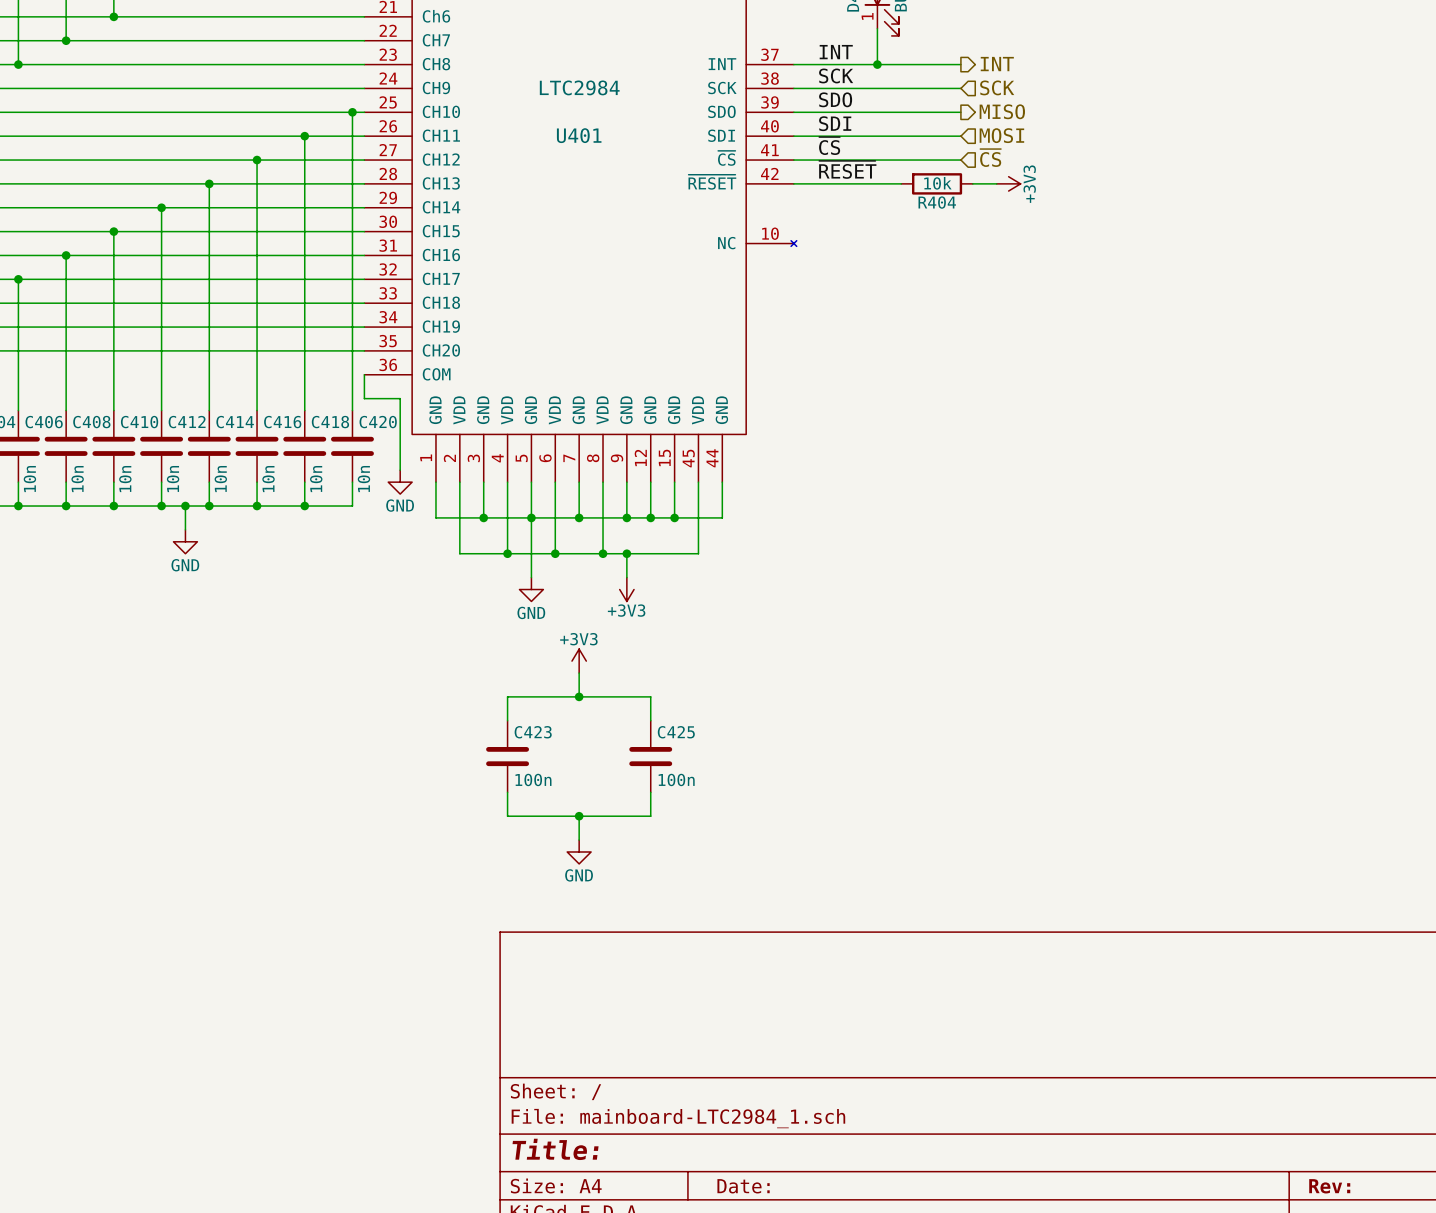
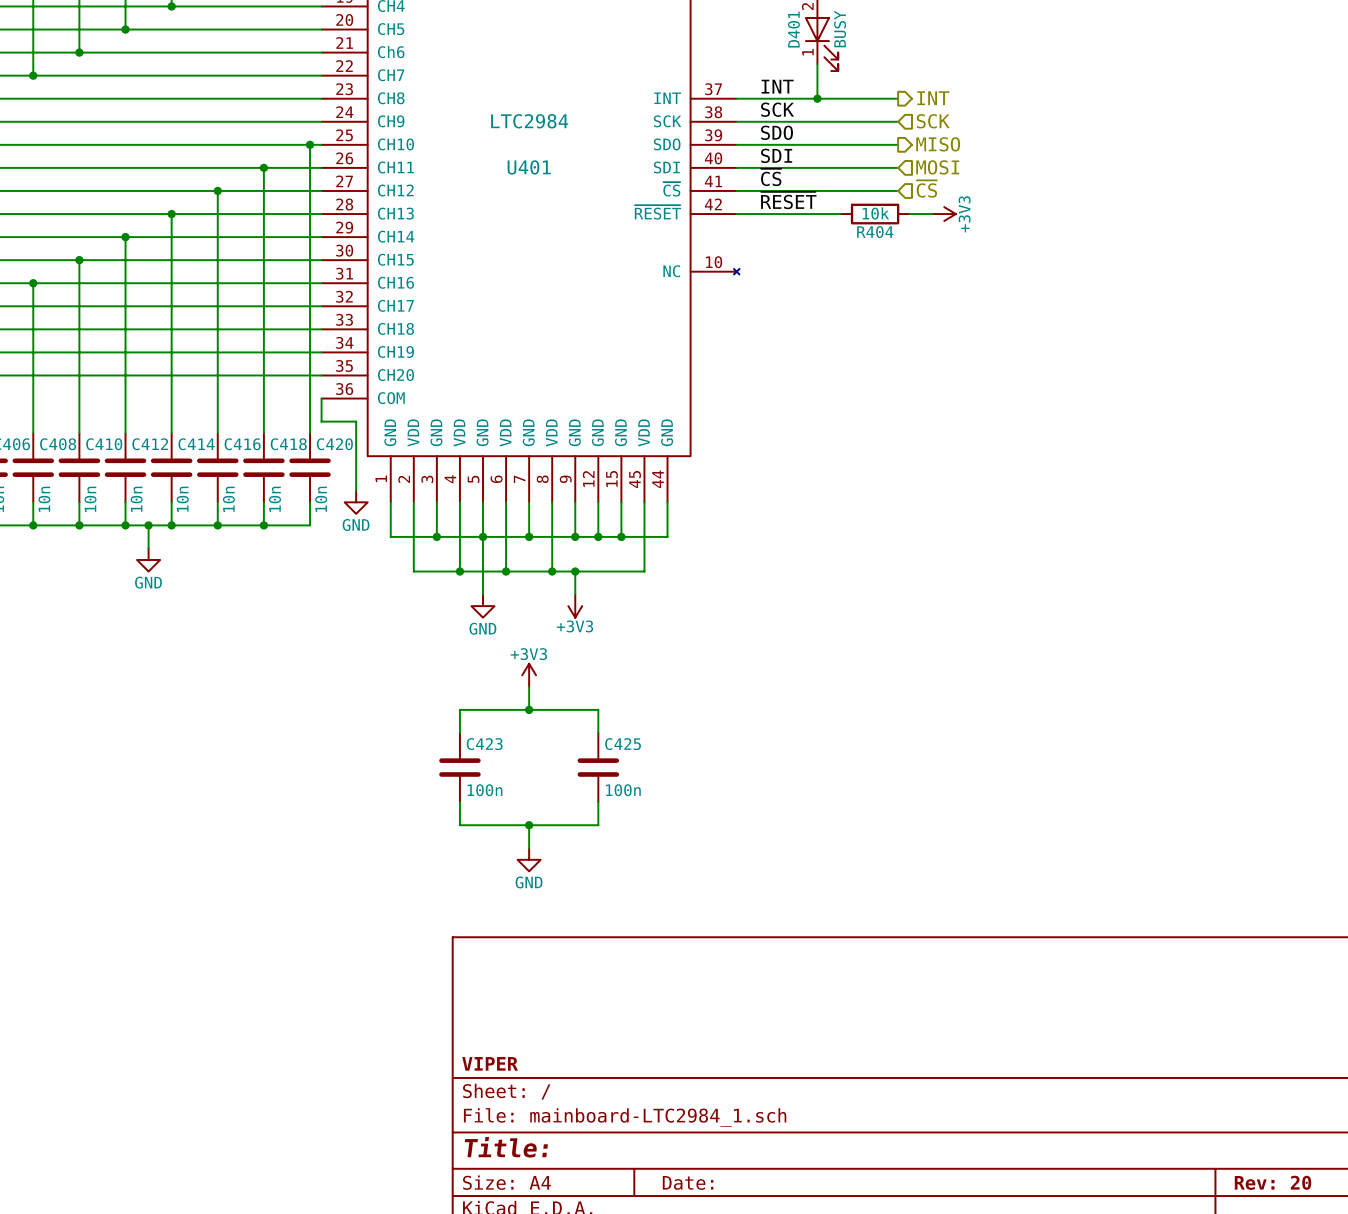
title block: none -> VIPER (490, 1063)
title block: Rev: (1329, 1186) -> Rev: 20 (1273, 1182)

